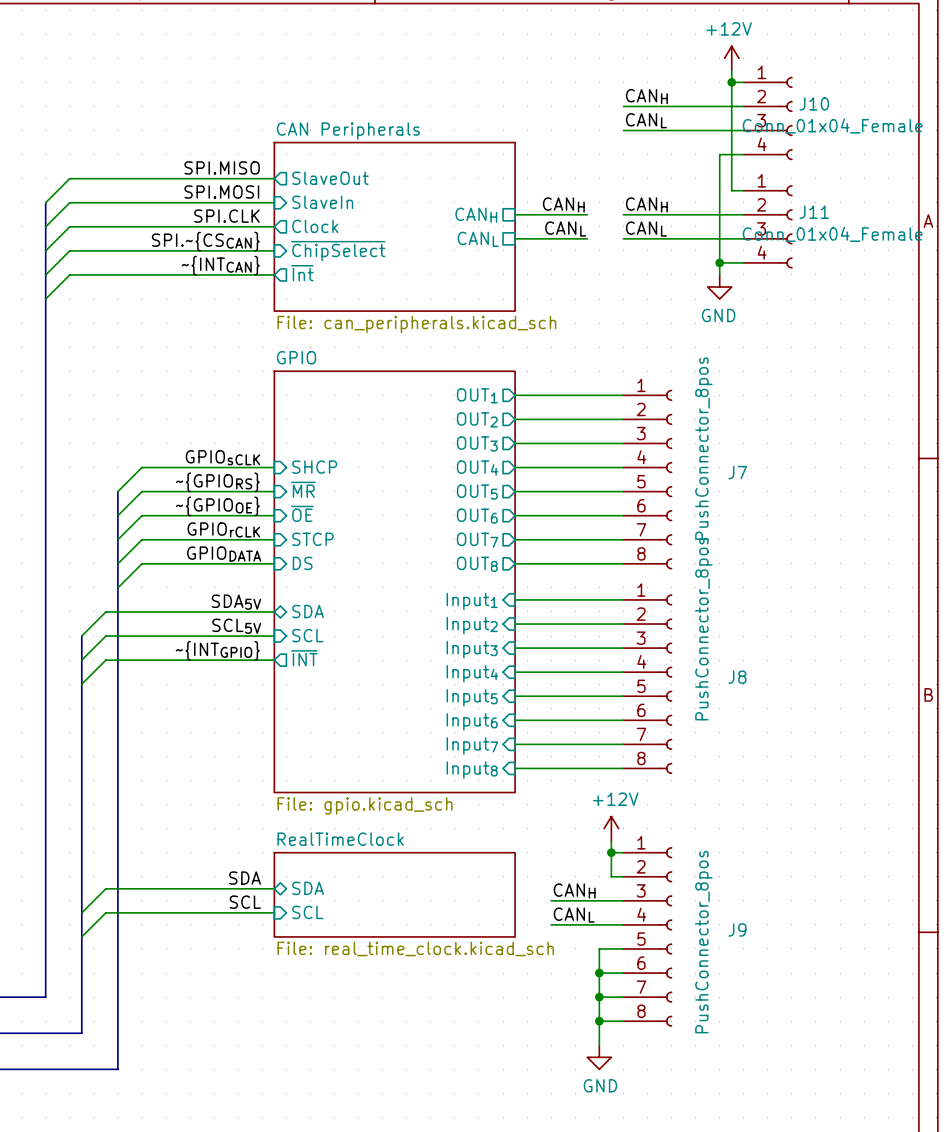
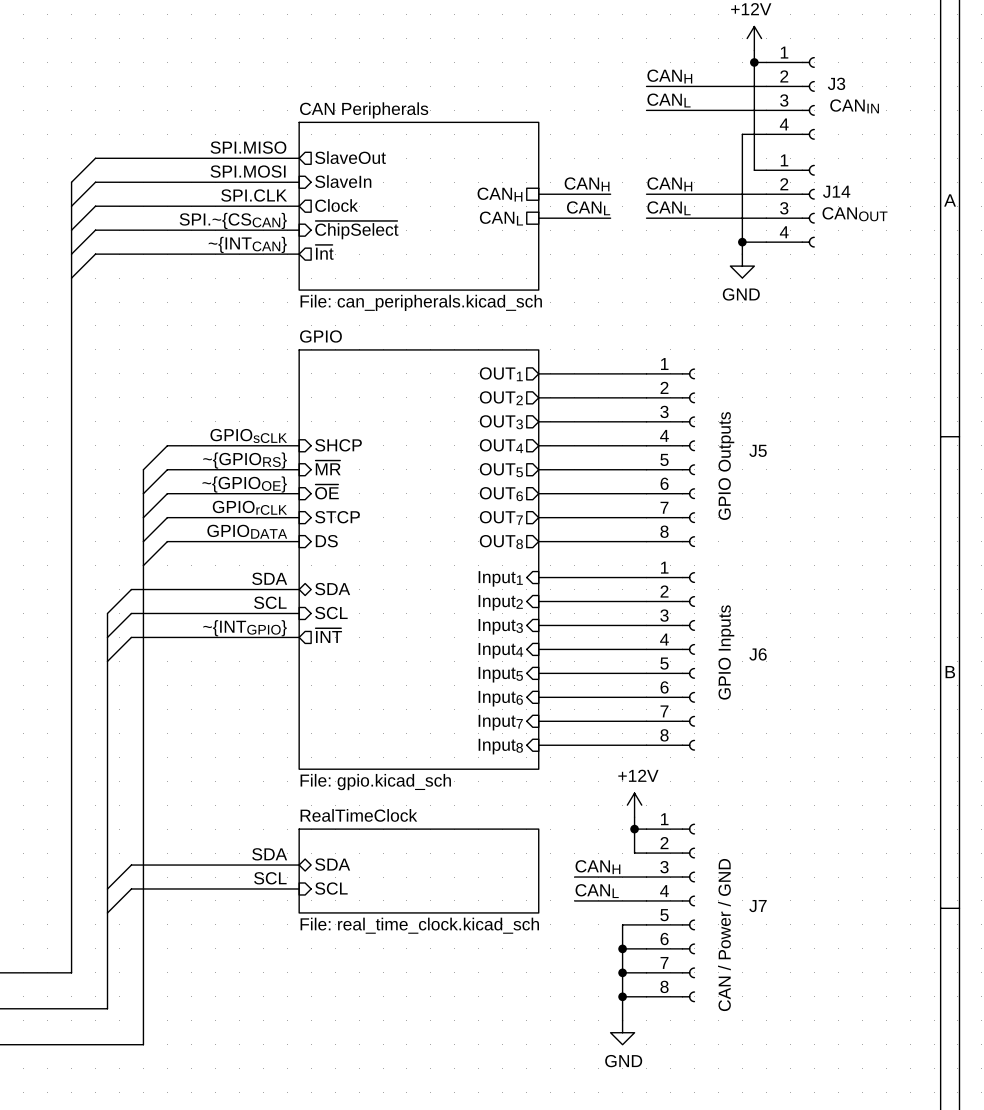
J10 name: J10 (814, 103) -> J3 (836, 83)
J10 value: Conn_01x04_Female (832, 125) -> CANIN (854, 106)
J11 name: J11 (814, 212) -> J14 (836, 191)
J11 value: Conn_01x04_Female (832, 234) -> CANOUT (855, 214)
J7 value: PushConnector_8pos (703, 448) -> GPIO Outputs (726, 466)
J7 name: J7 (737, 472) -> J5 (758, 450)
label: SDA5V (236, 602) -> SDA (269, 578)
label: SCL5V (236, 626) -> SCL (270, 602)
J8 value: PushConnector_8pos (703, 629) -> GPIO Inputs (726, 652)
J8 name: J8 (737, 677) -> J6 (758, 654)
J9 name: J9 (737, 929) -> J7 (757, 906)
J9 value: PushConnector_8pos (703, 942) -> CAN / Power / GND (724, 935)

